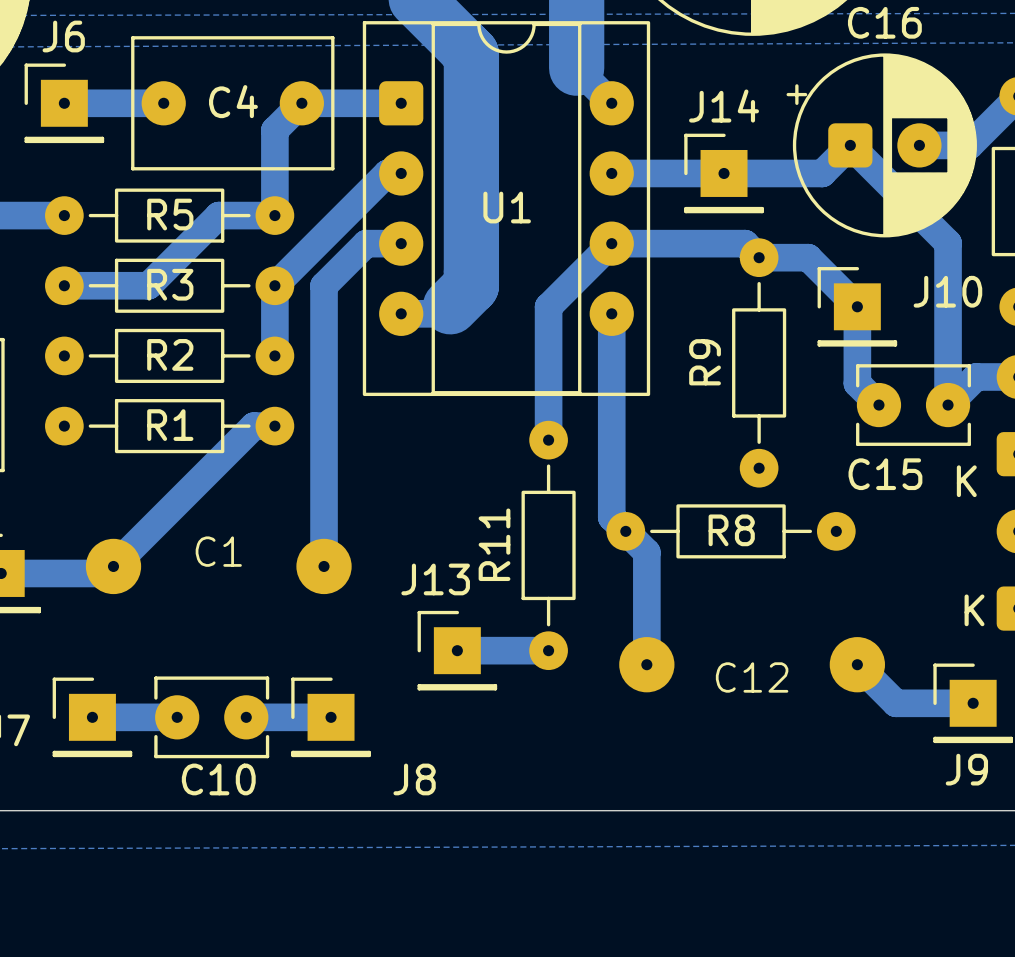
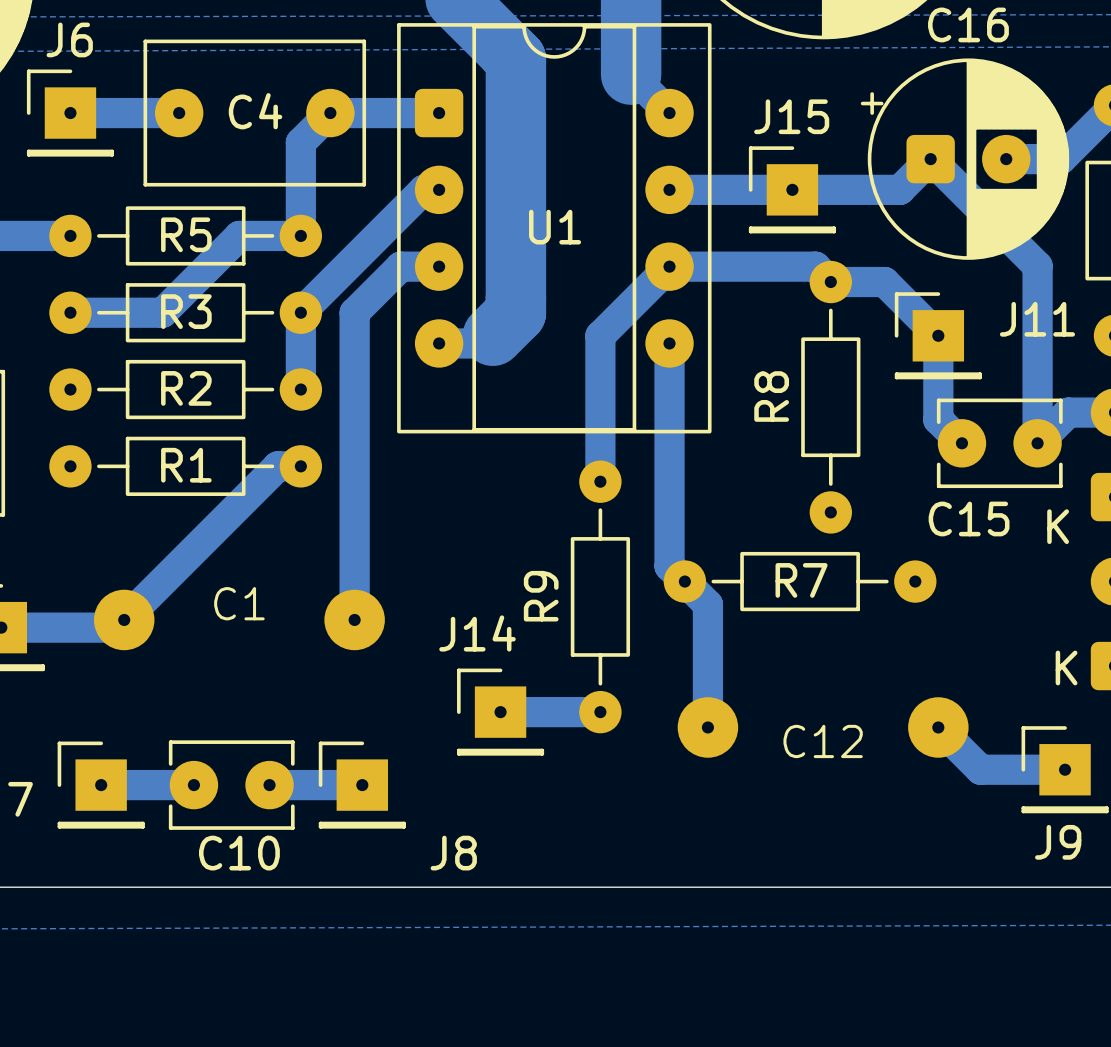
J14 name: J14 (724, 106) -> J15 (791, 116)
J10 name: J10 (947, 291) -> J11 (1037, 319)
R9 name: R9 (705, 362) -> R8 (771, 396)
R8 name: R8 (731, 530) -> R7 (801, 580)
R11 name: R11 (494, 544) -> R9 (541, 596)
J13 name: J13 (435, 579) -> J14 (477, 633)

